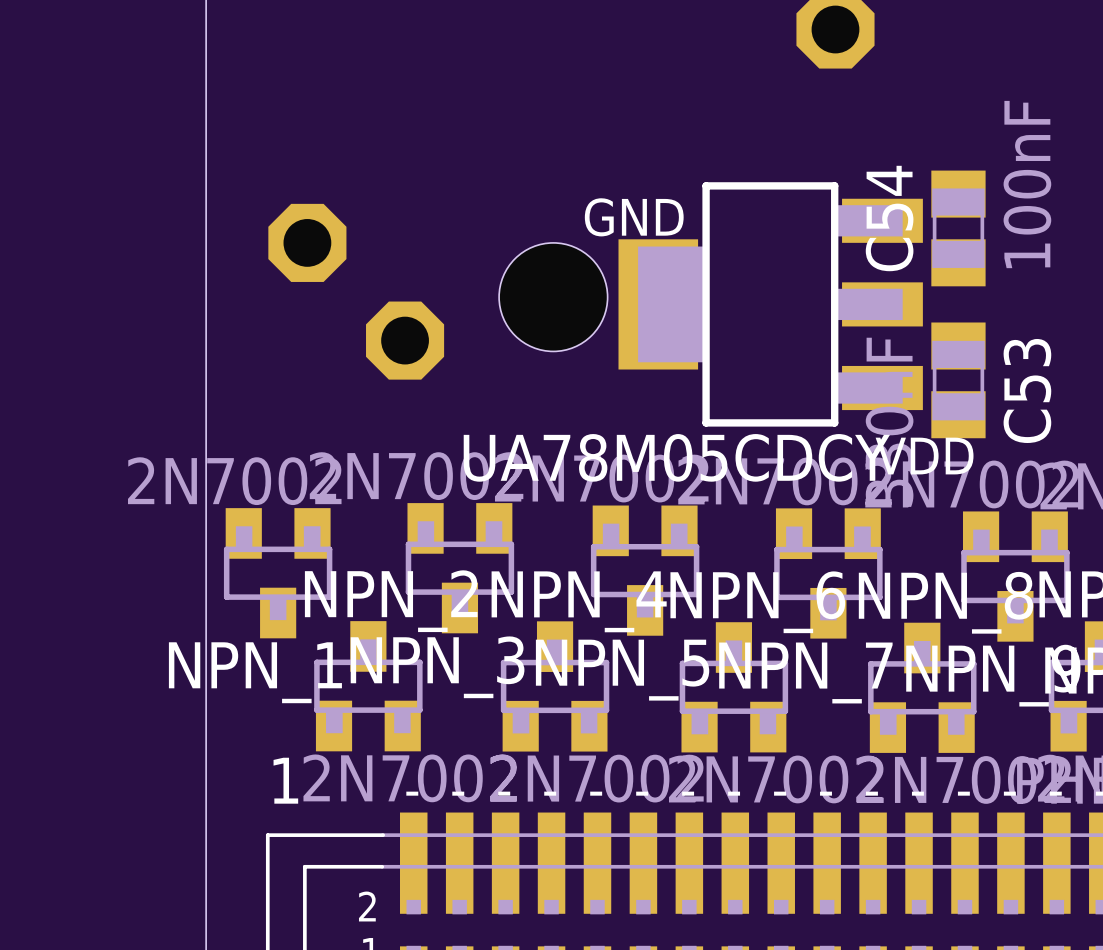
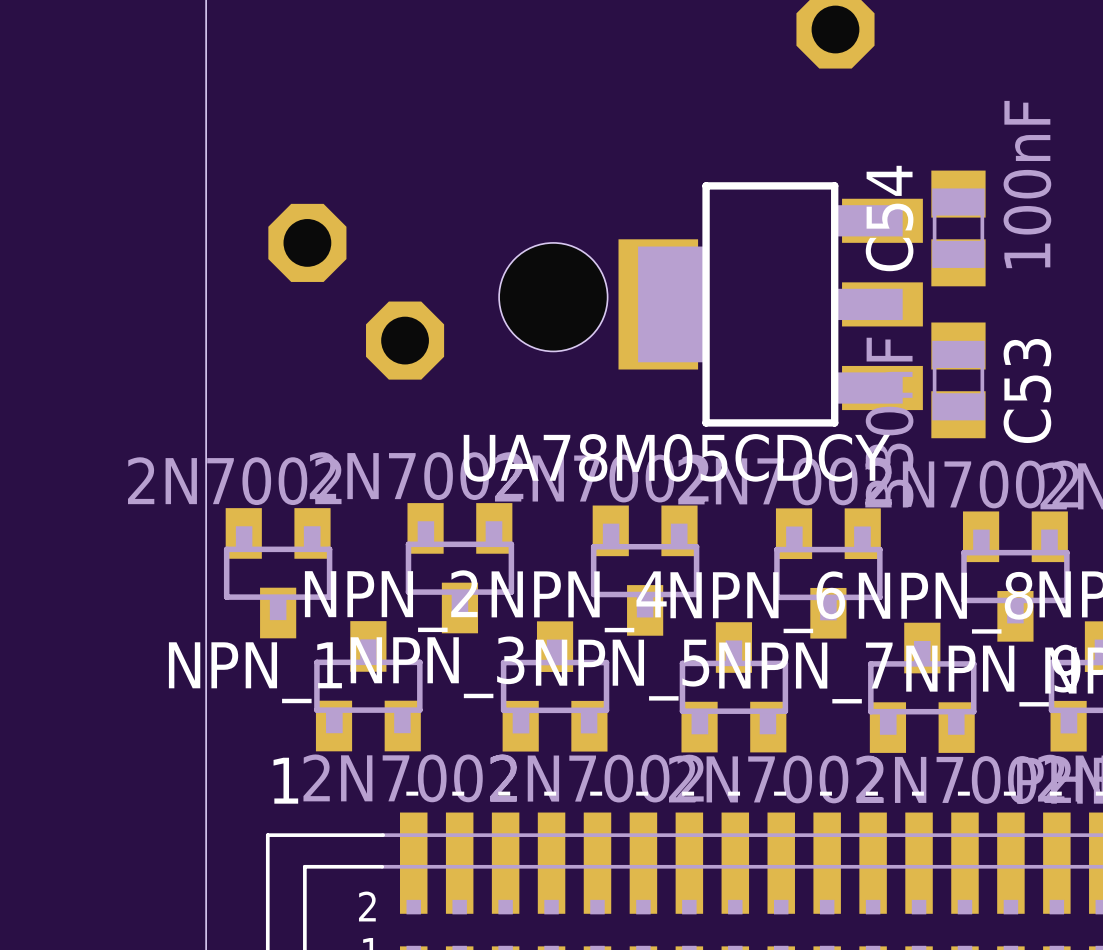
text: GND (634, 217) -> none
text: VDD (924, 456) -> none

